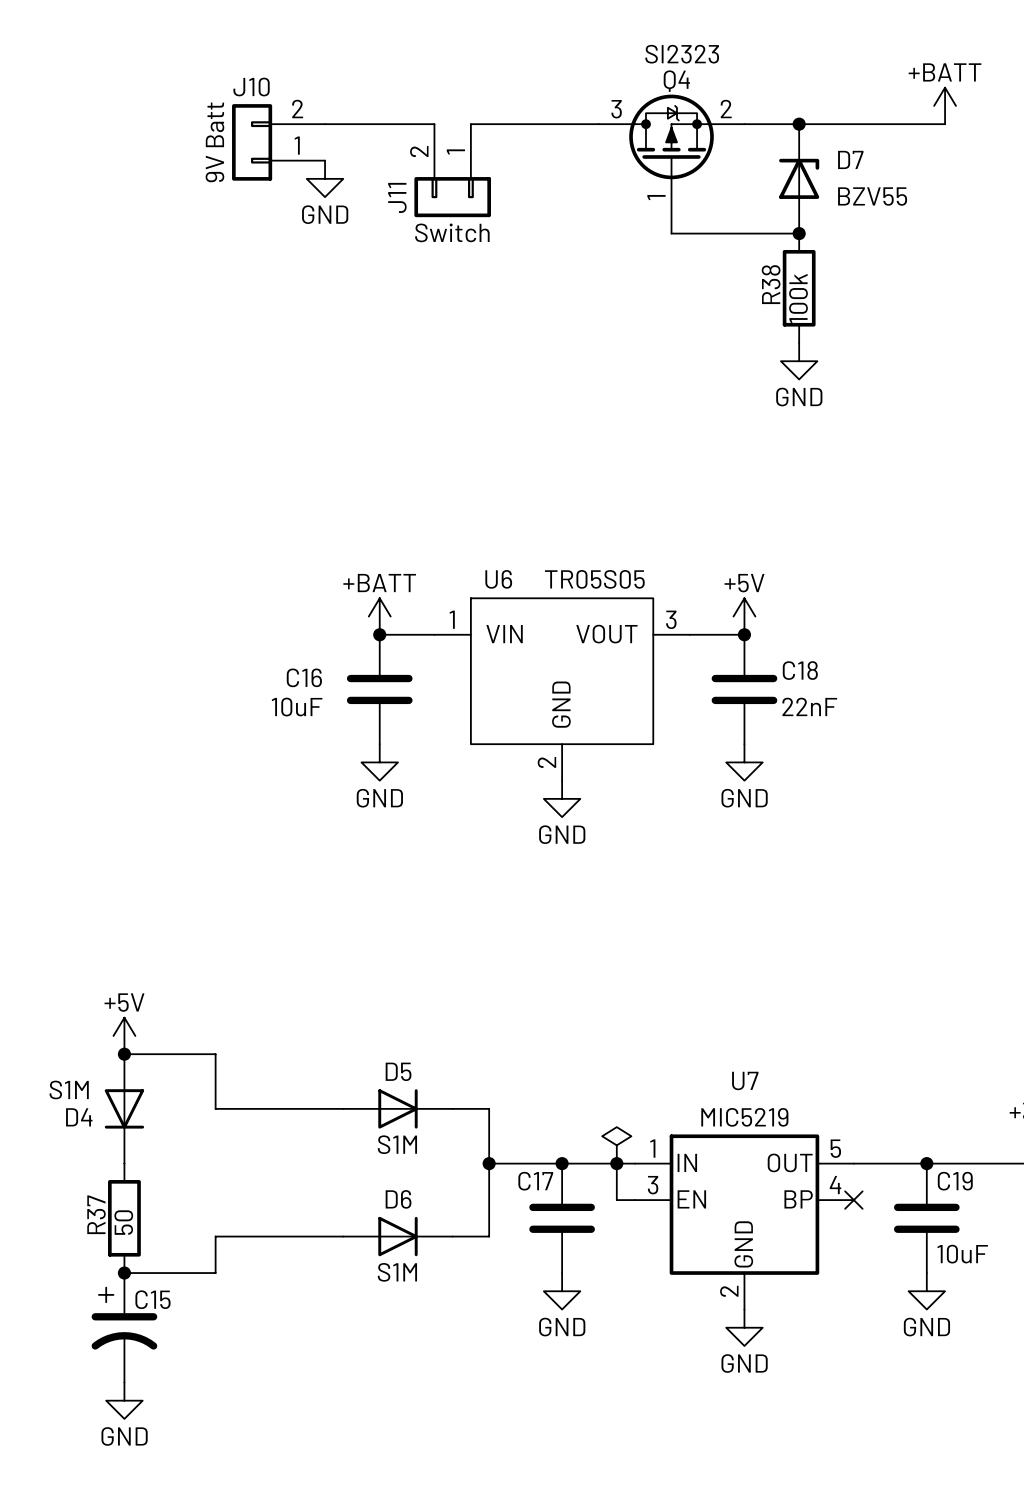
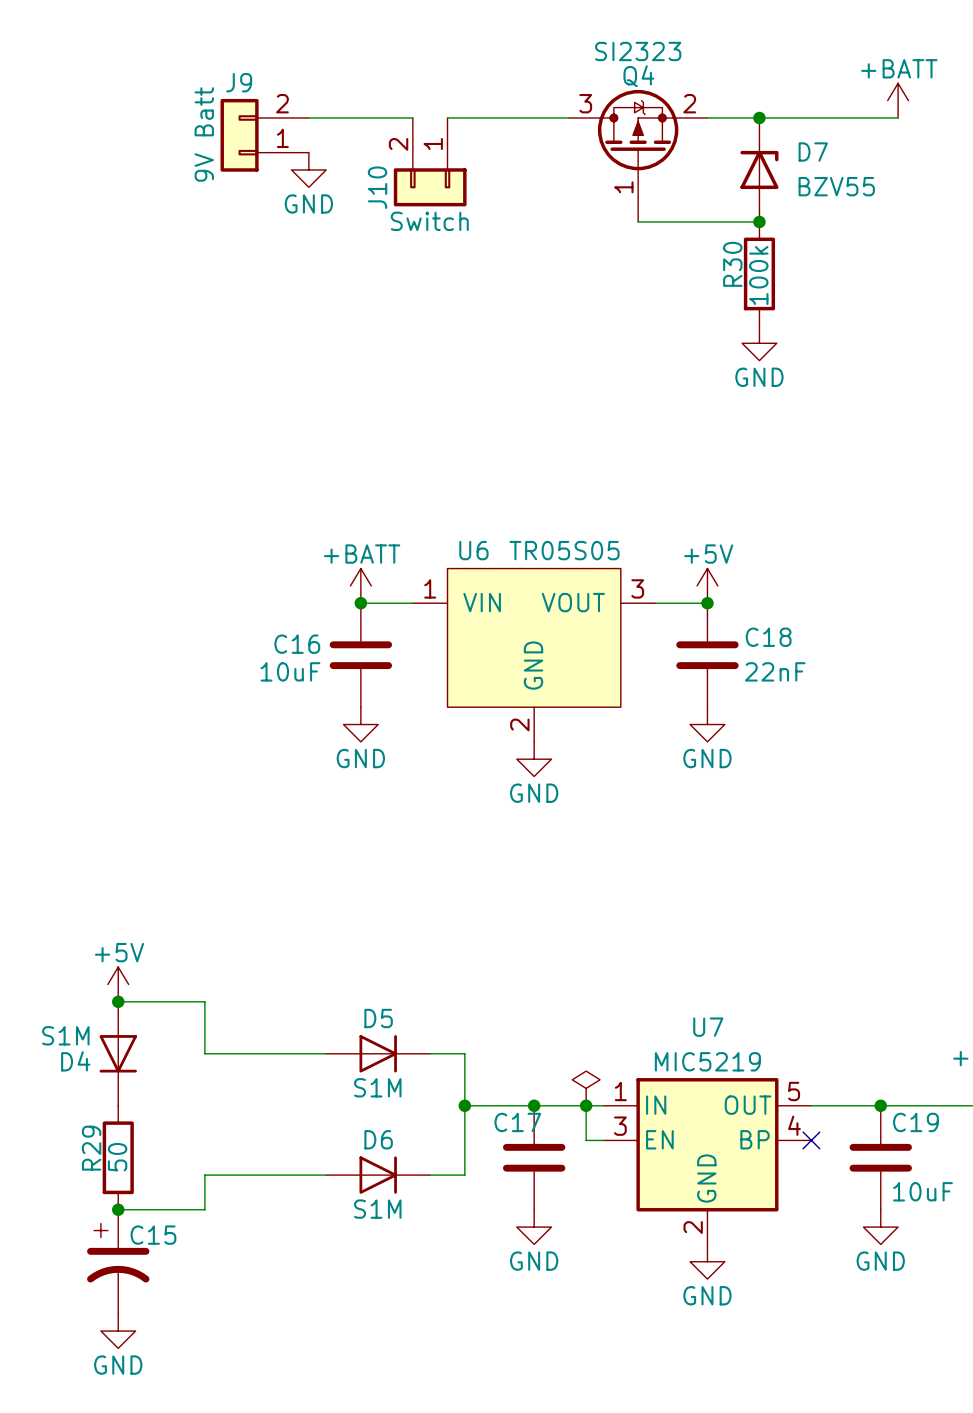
J10 name: J10 (251, 87) -> J9 (239, 82)
J11 name: J11 (397, 197) -> J10 (377, 187)
R38 name: R38 (771, 284) -> R30 (732, 264)
R37 name: R37 (96, 1214) -> R29 (91, 1148)

